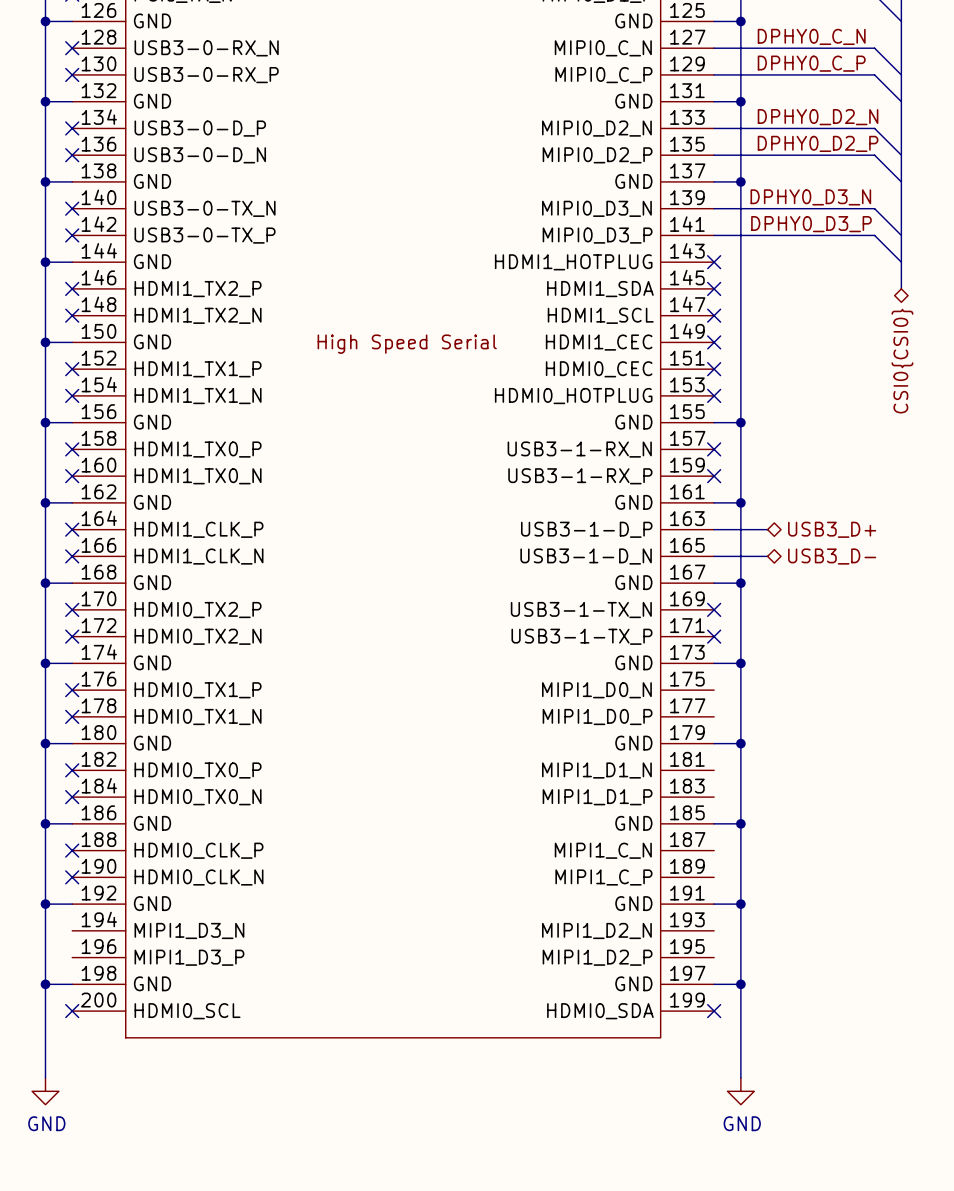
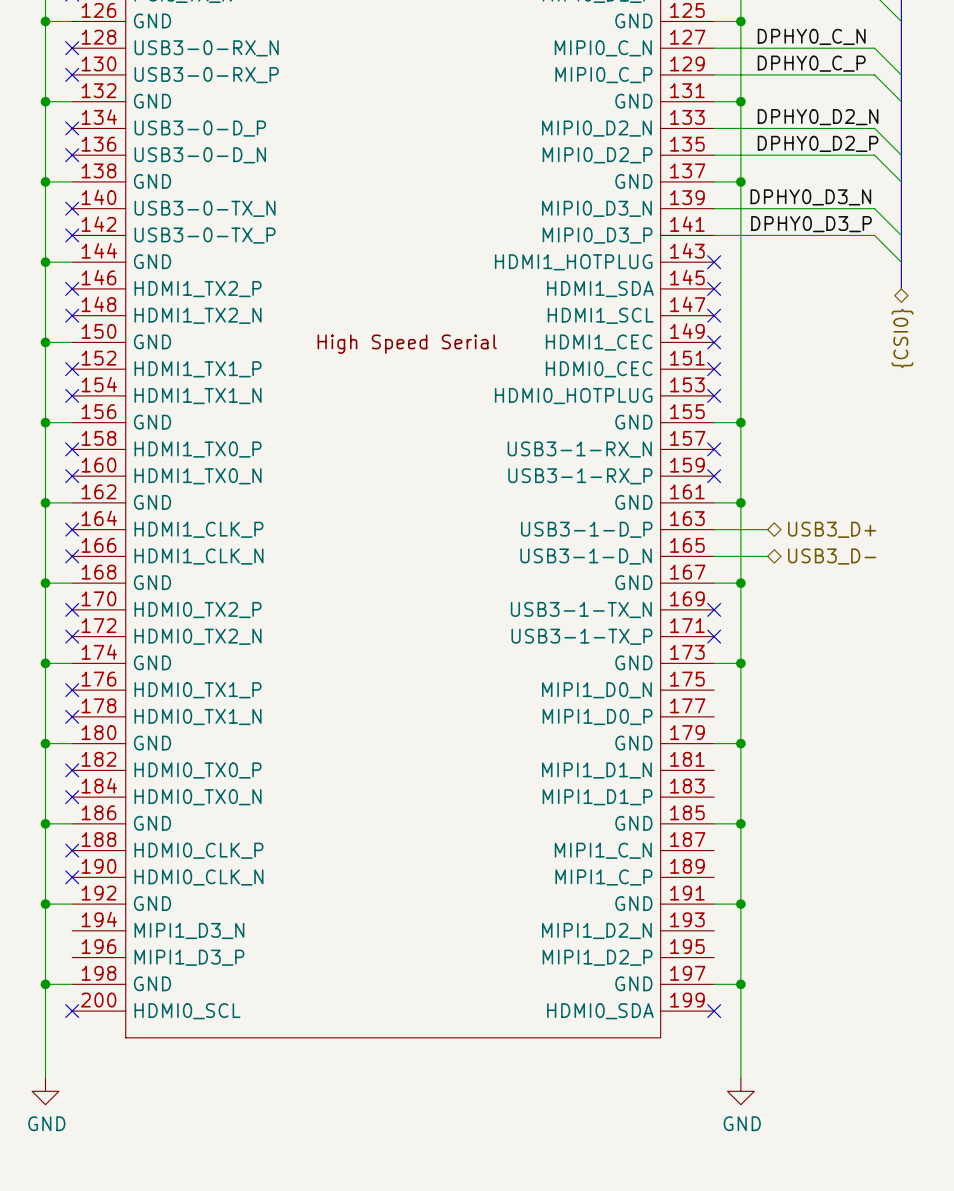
hierarchical label: CSI0{CSI0} (902, 361) -> {CSI0} (902, 338)

